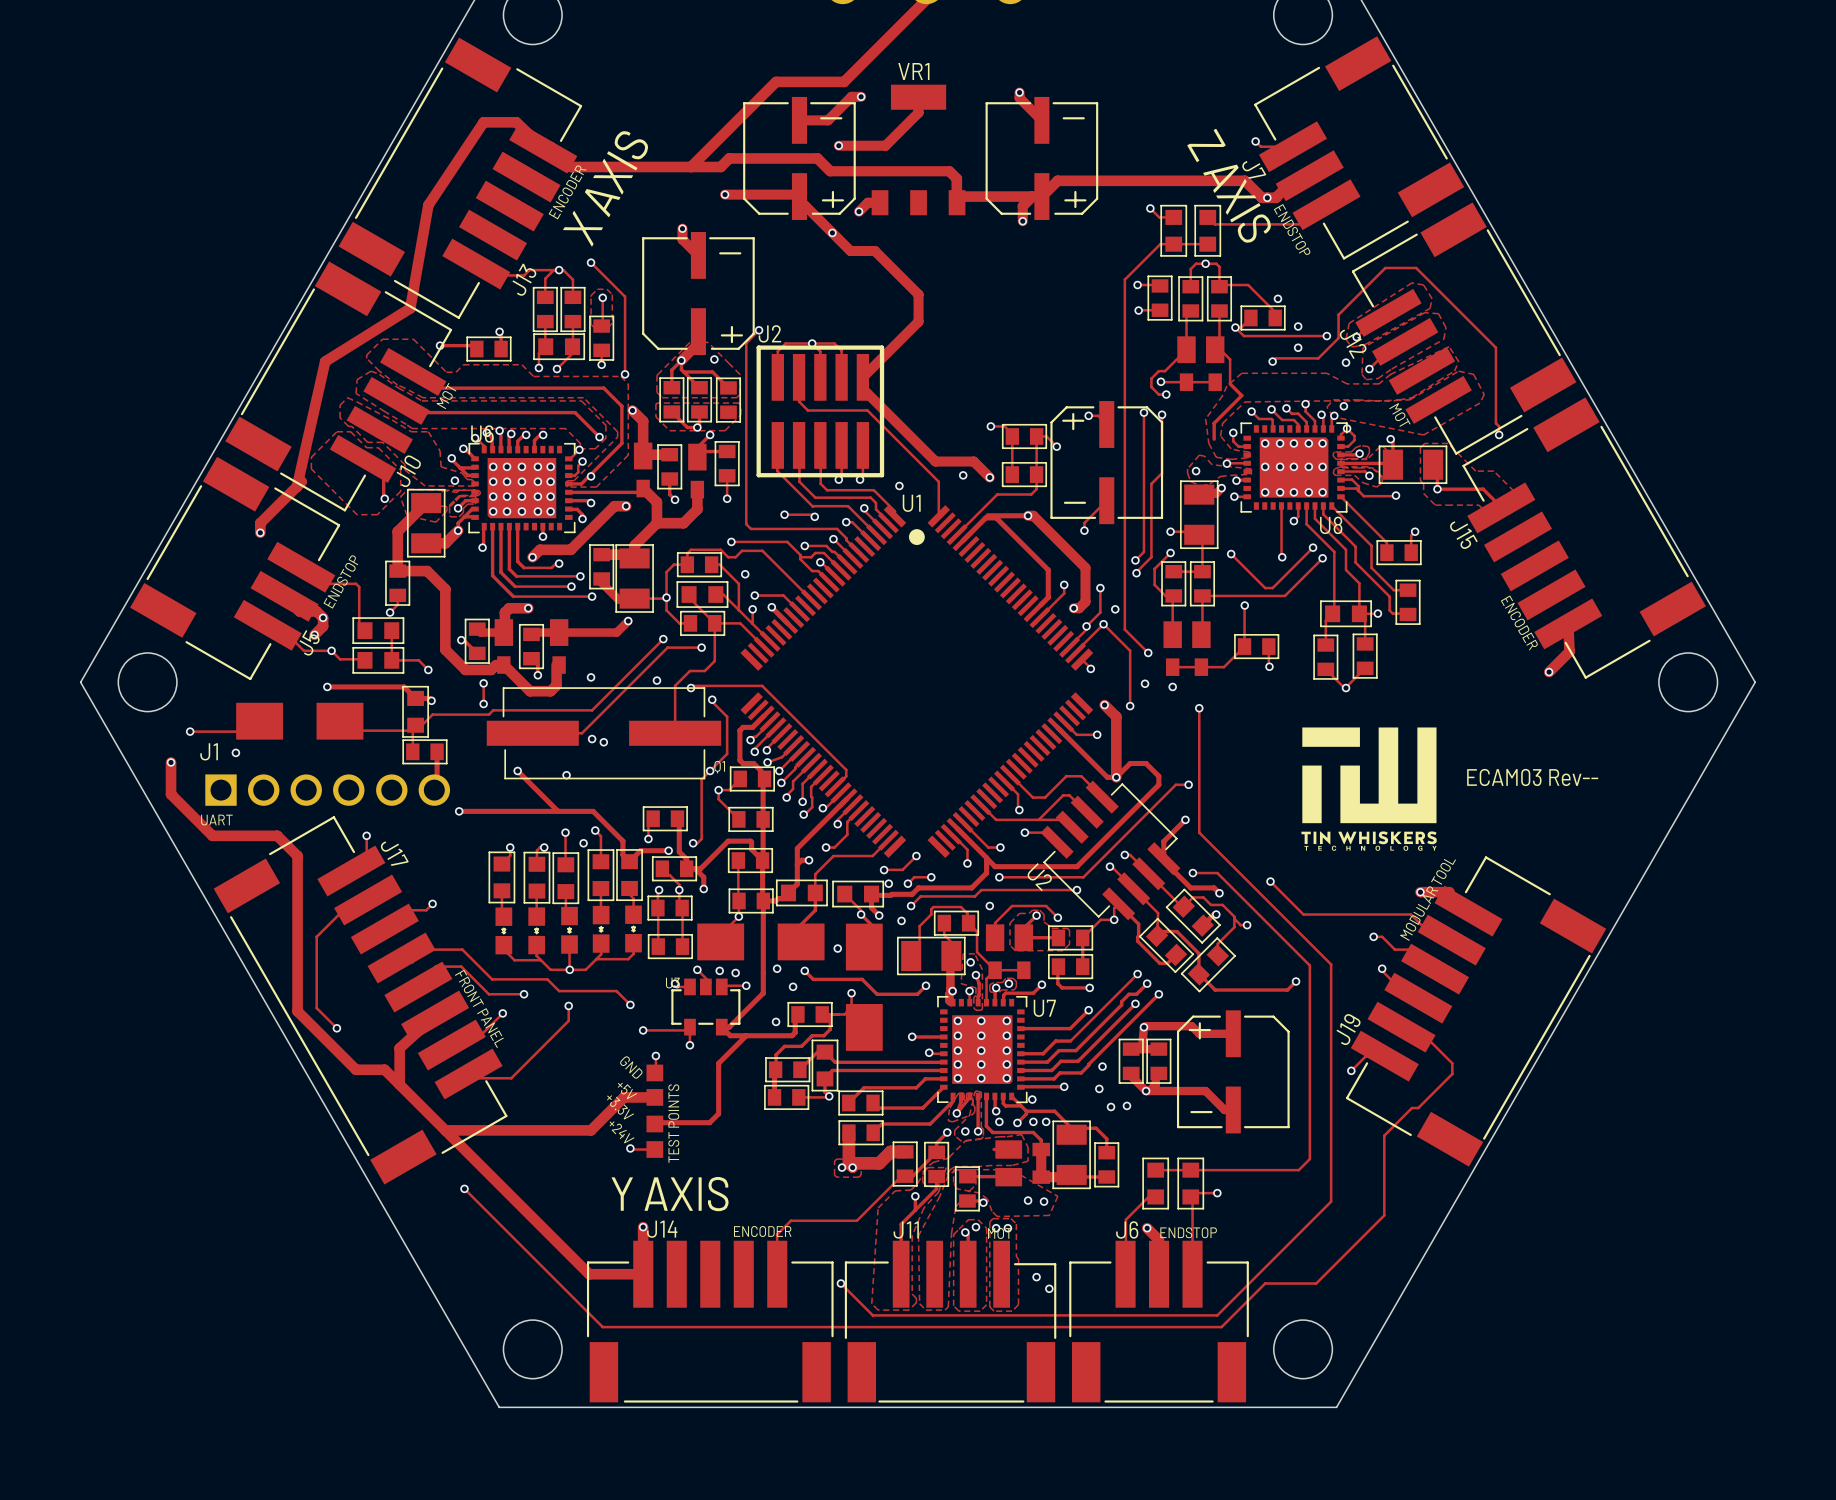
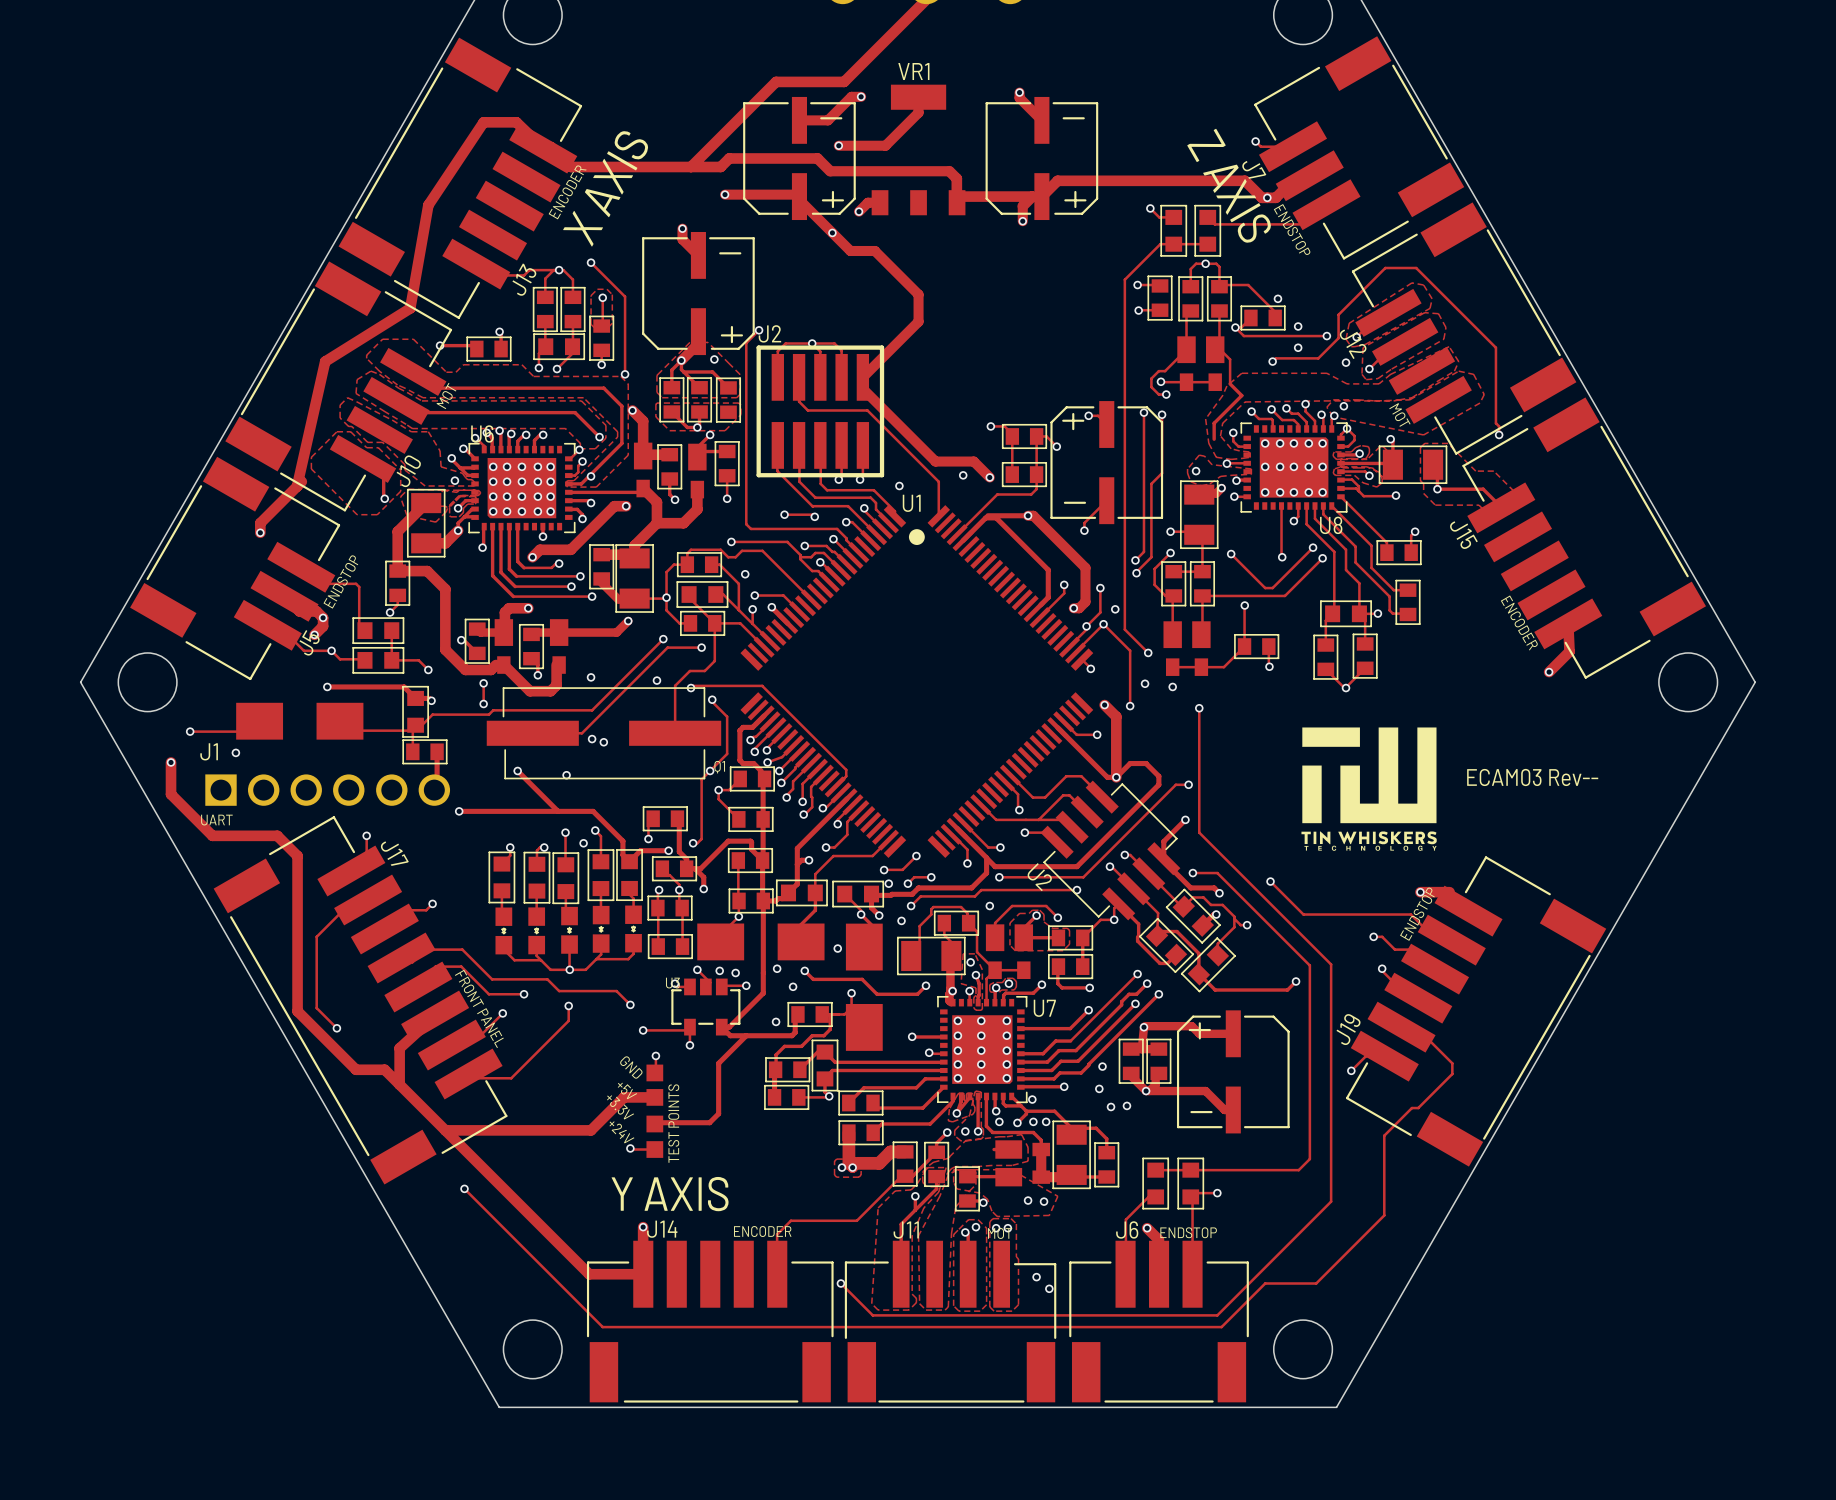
text: MODULAR TOOL (1428, 899) -> ENDSTOP (1417, 914)

